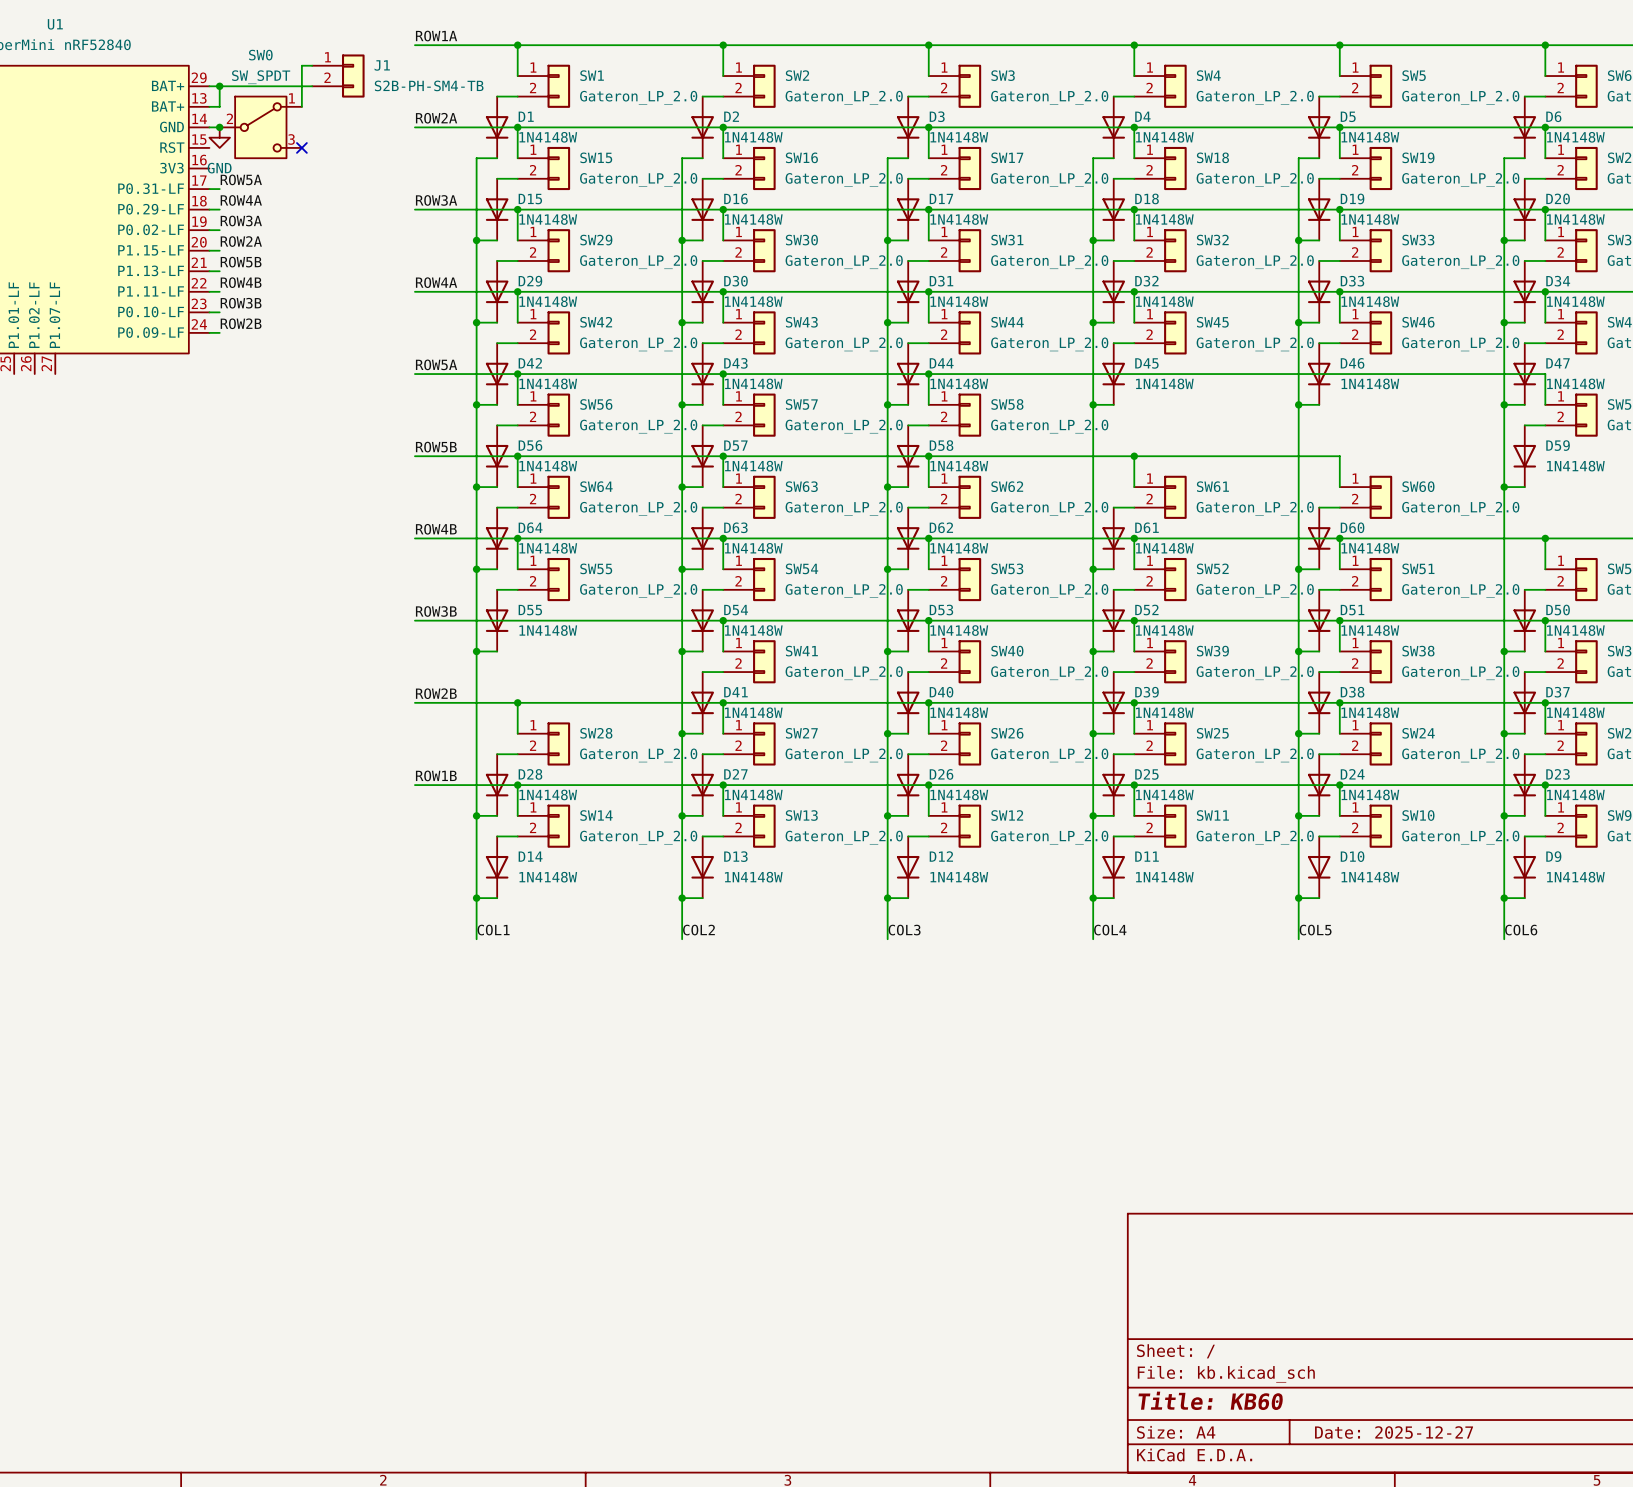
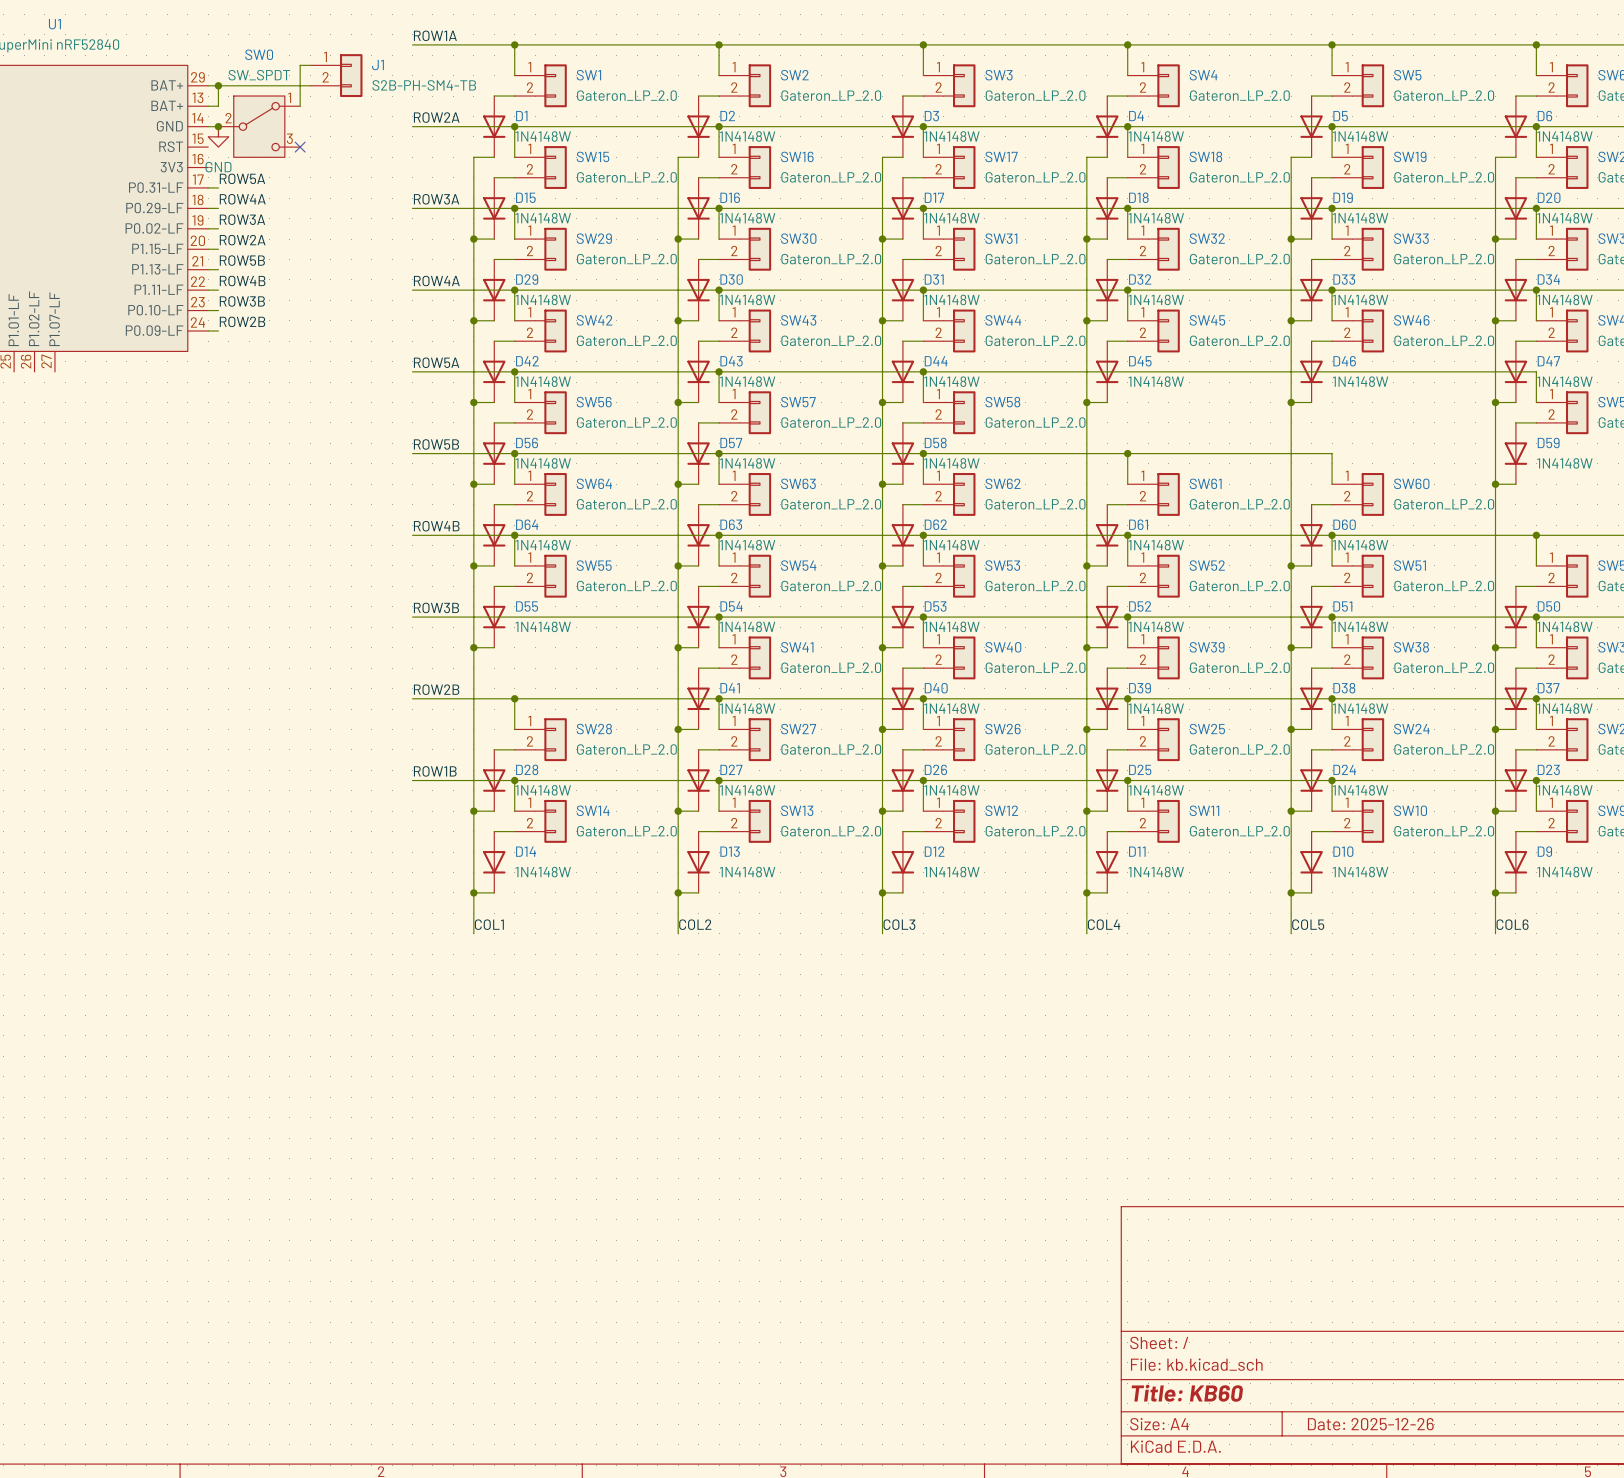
title block: Date: 2025-12-27 (1394, 1432) -> Date: 2025-12-26 (1370, 1424)

